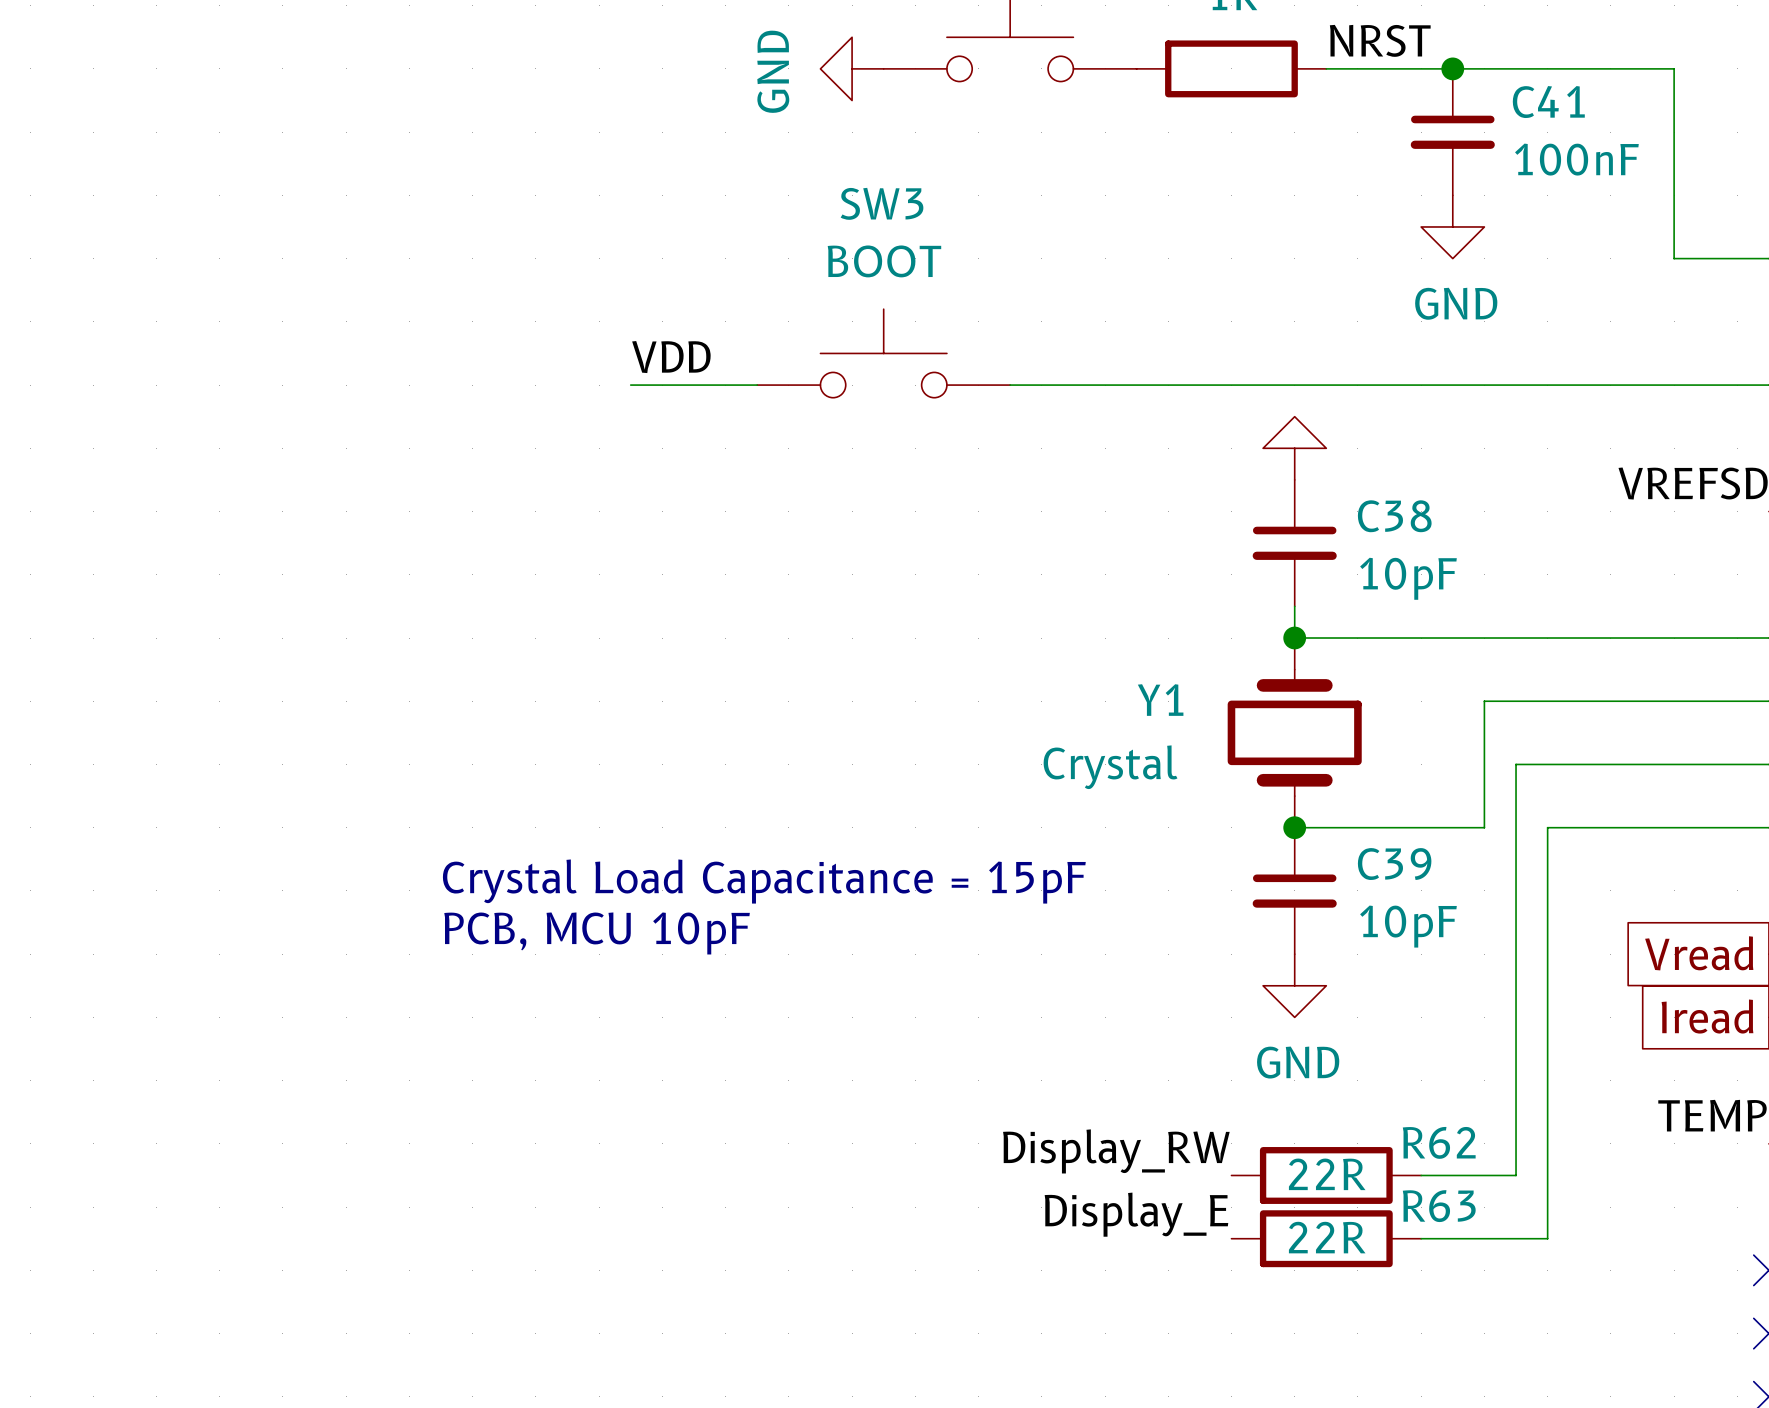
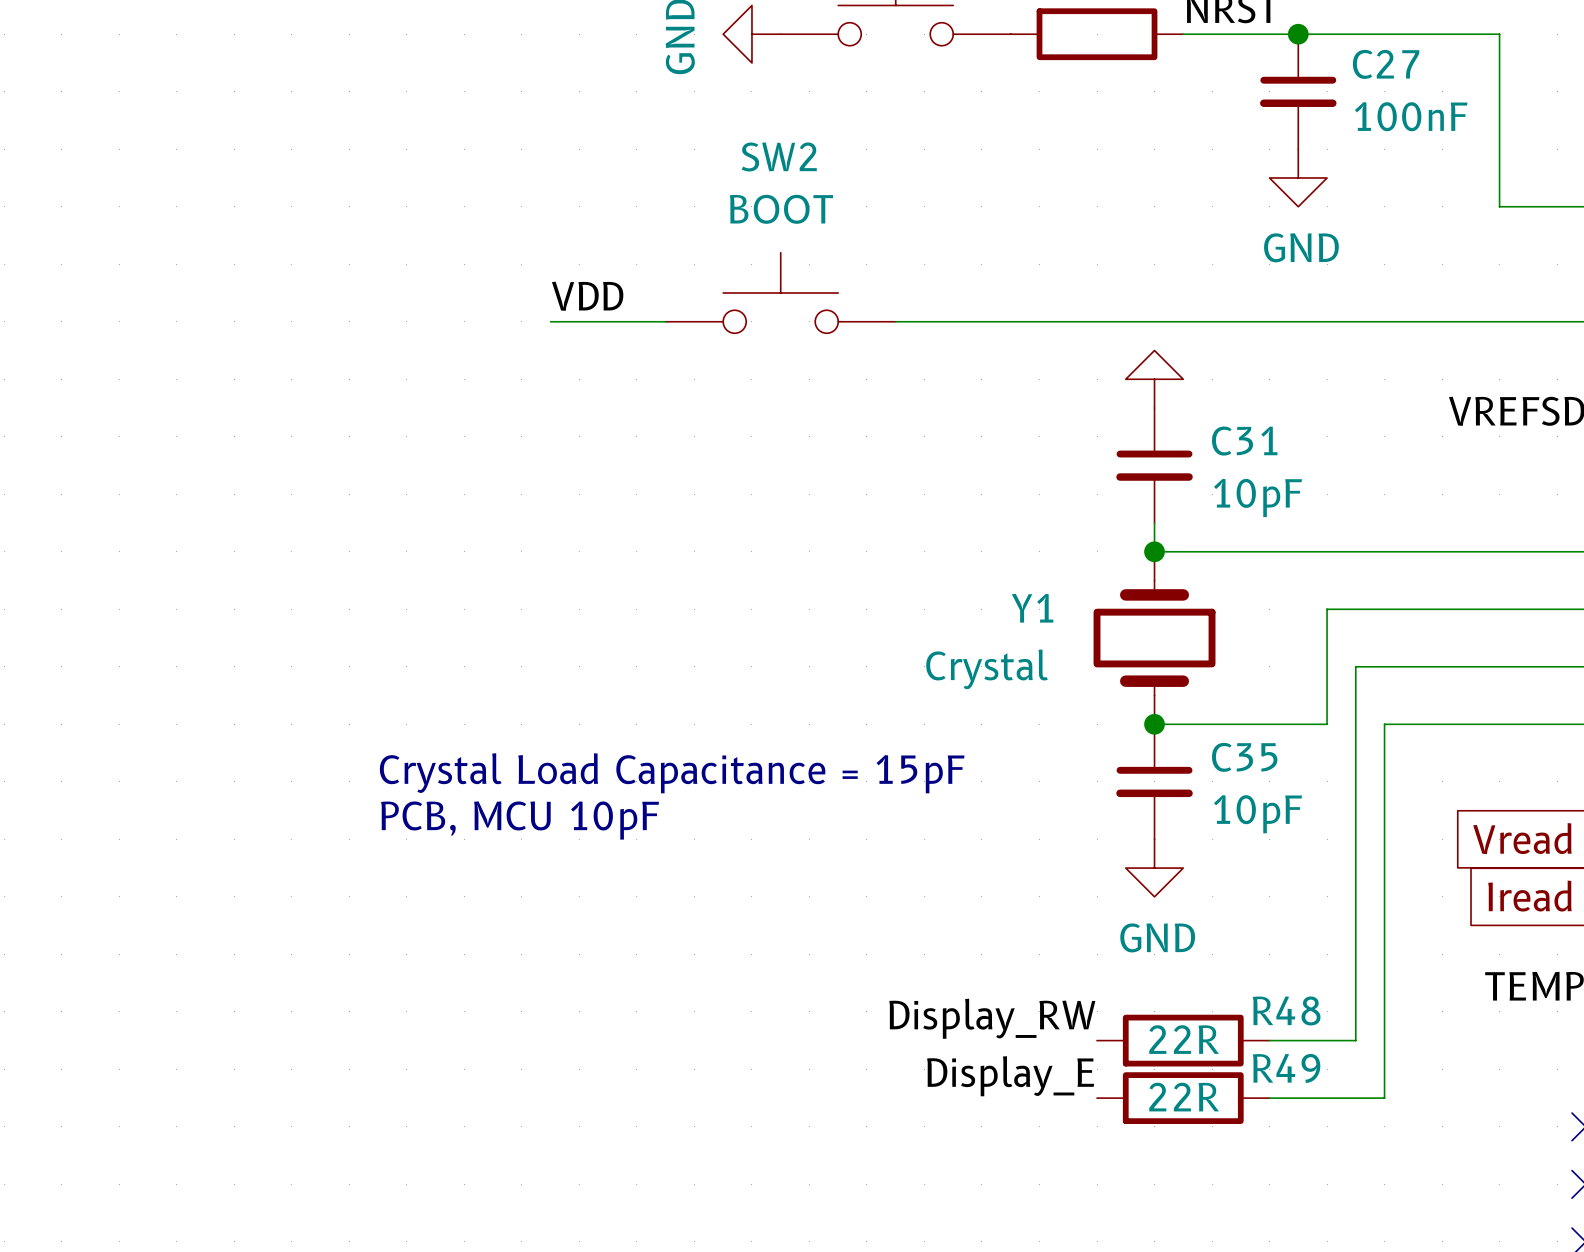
C41 name: C41 (1548, 102) -> C27 (1386, 64)
SW3 name: SW3 (882, 203) -> SW2 (779, 156)
C38 name: C38 (1394, 516) -> C31 (1244, 441)
C39 name: C39 (1394, 864) -> C35 (1244, 757)
R62 name: R62 (1439, 1142) -> R48 (1286, 1010)
R63 name: R63 (1439, 1206) -> R49 (1286, 1068)

